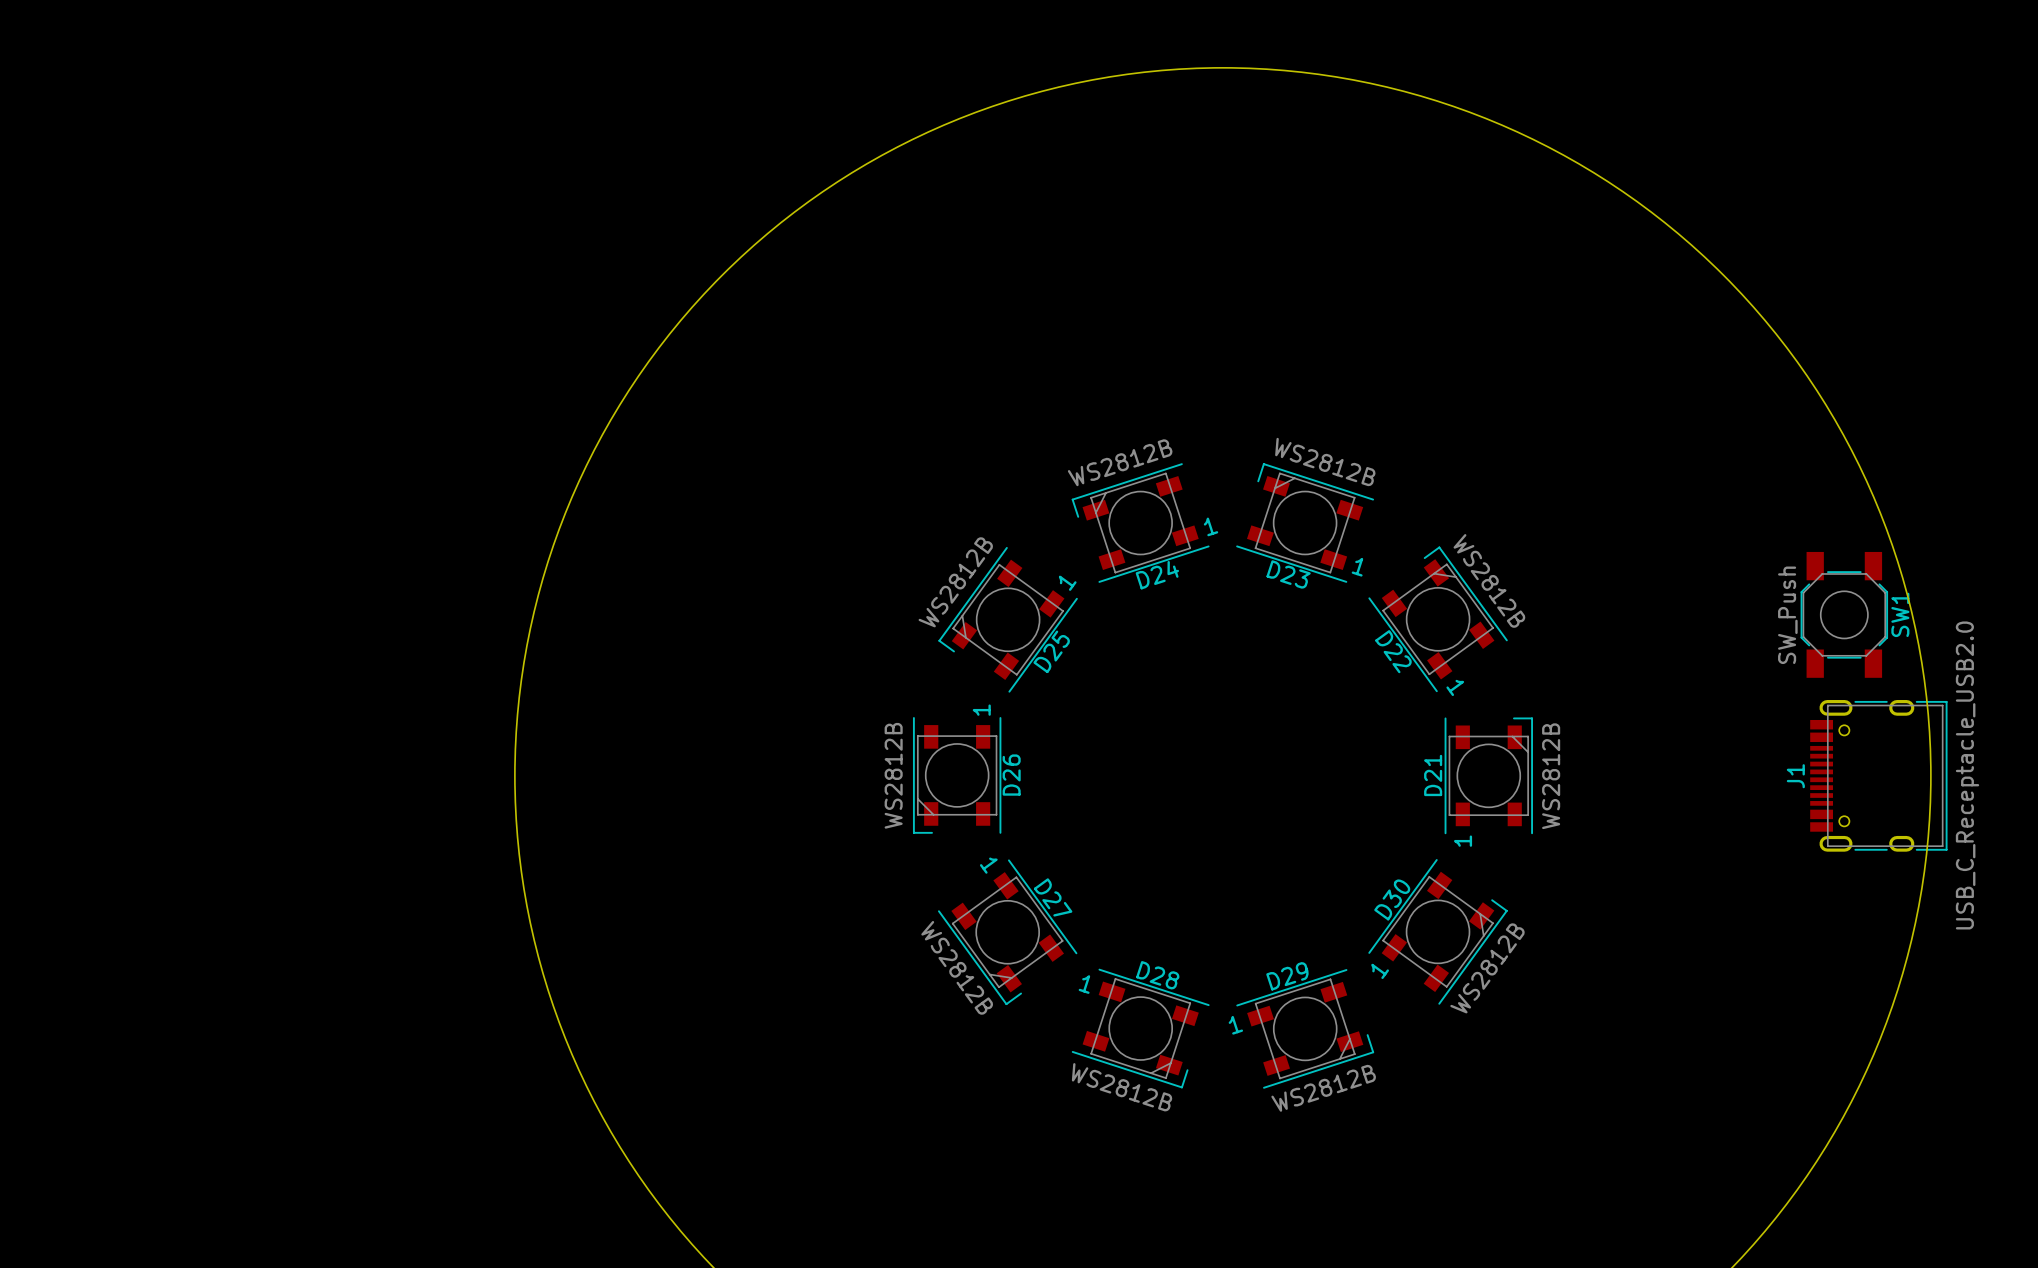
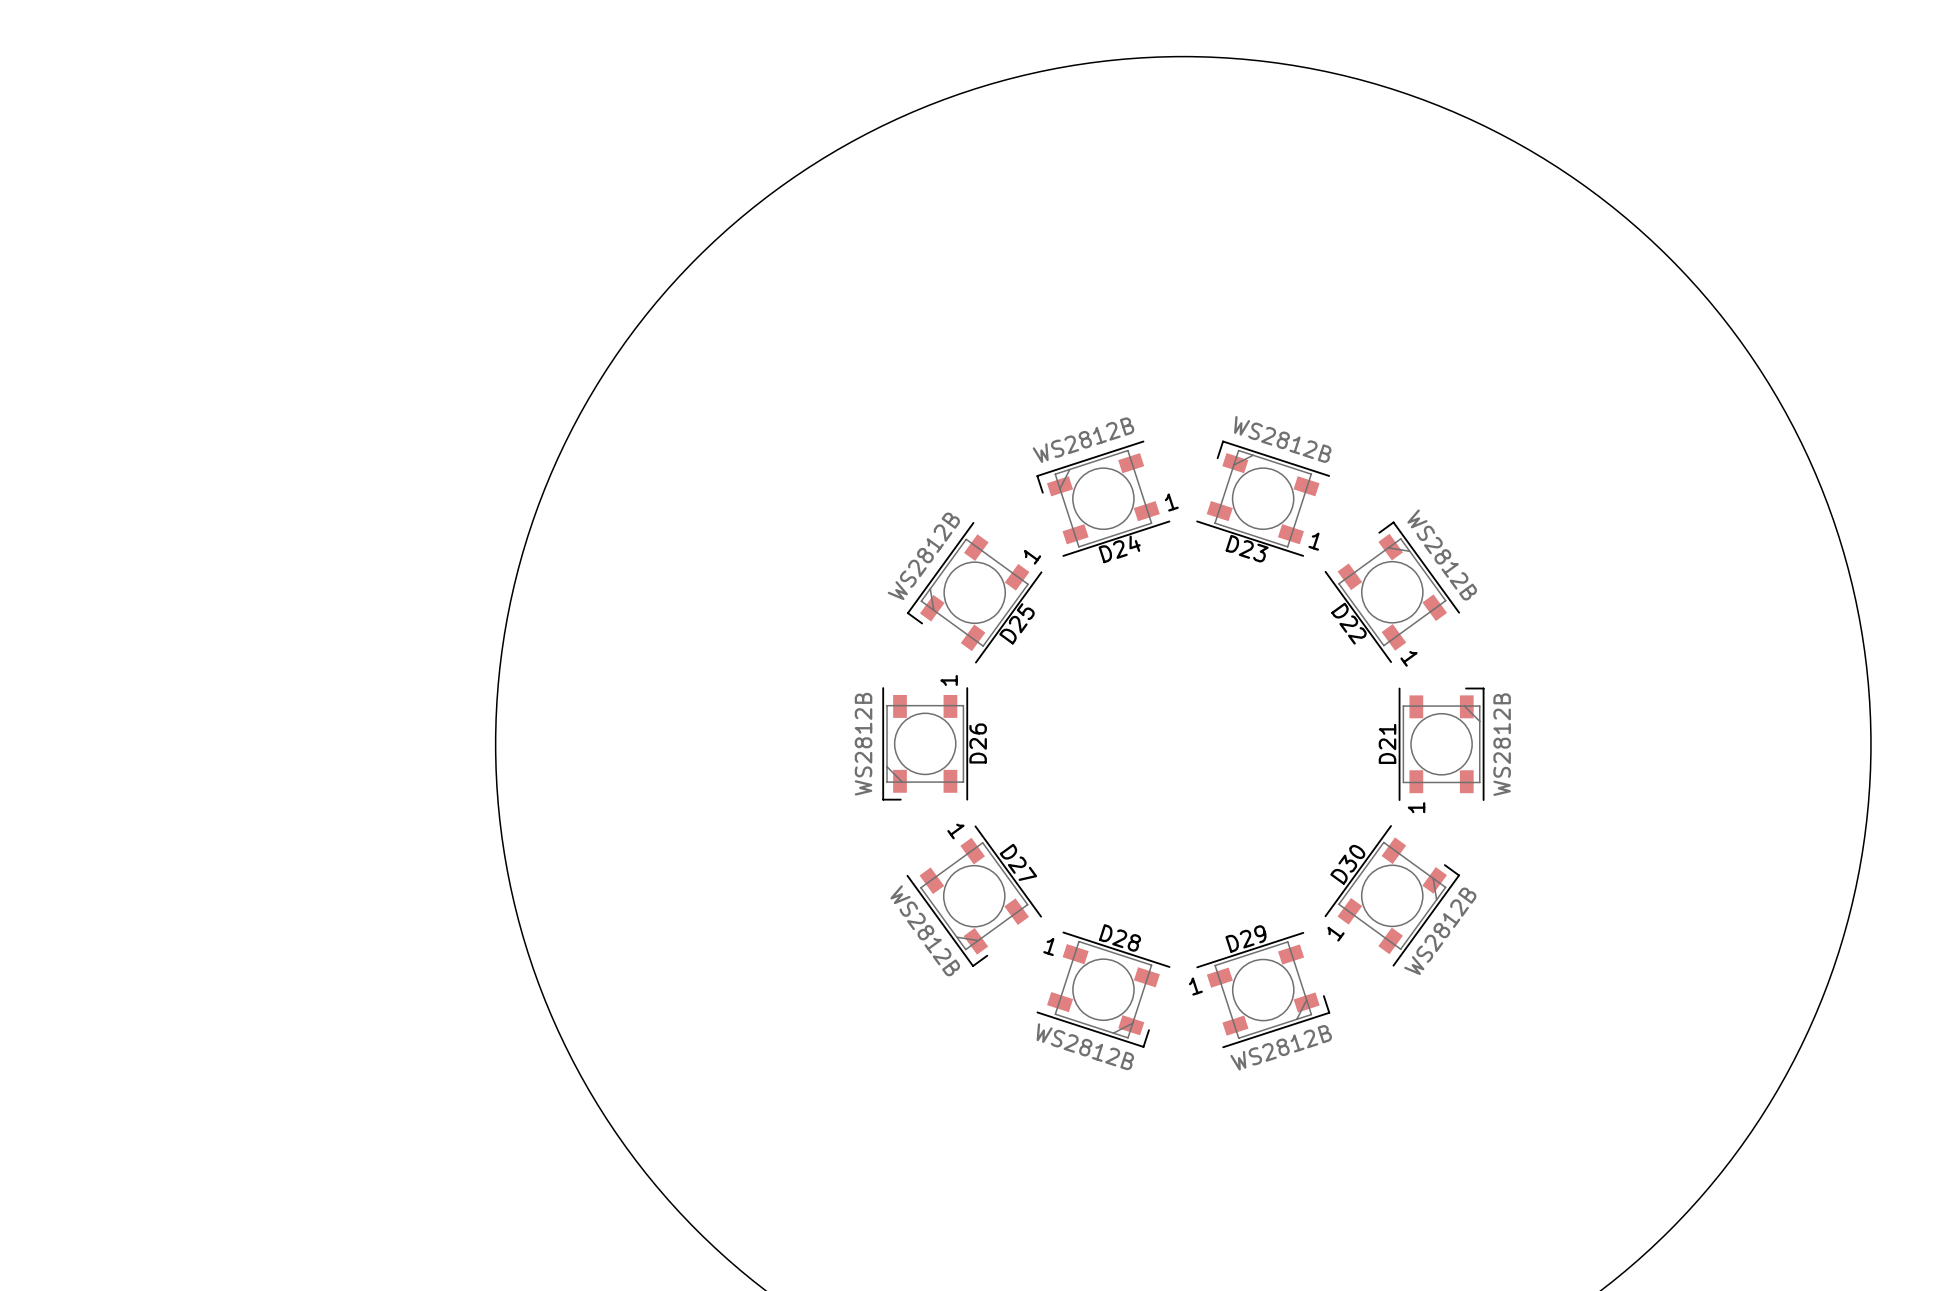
SW1: SW_Push (1844, 614) -> none
J1: USB_C_Receptacle_USB2.0 (1878, 775) -> none

